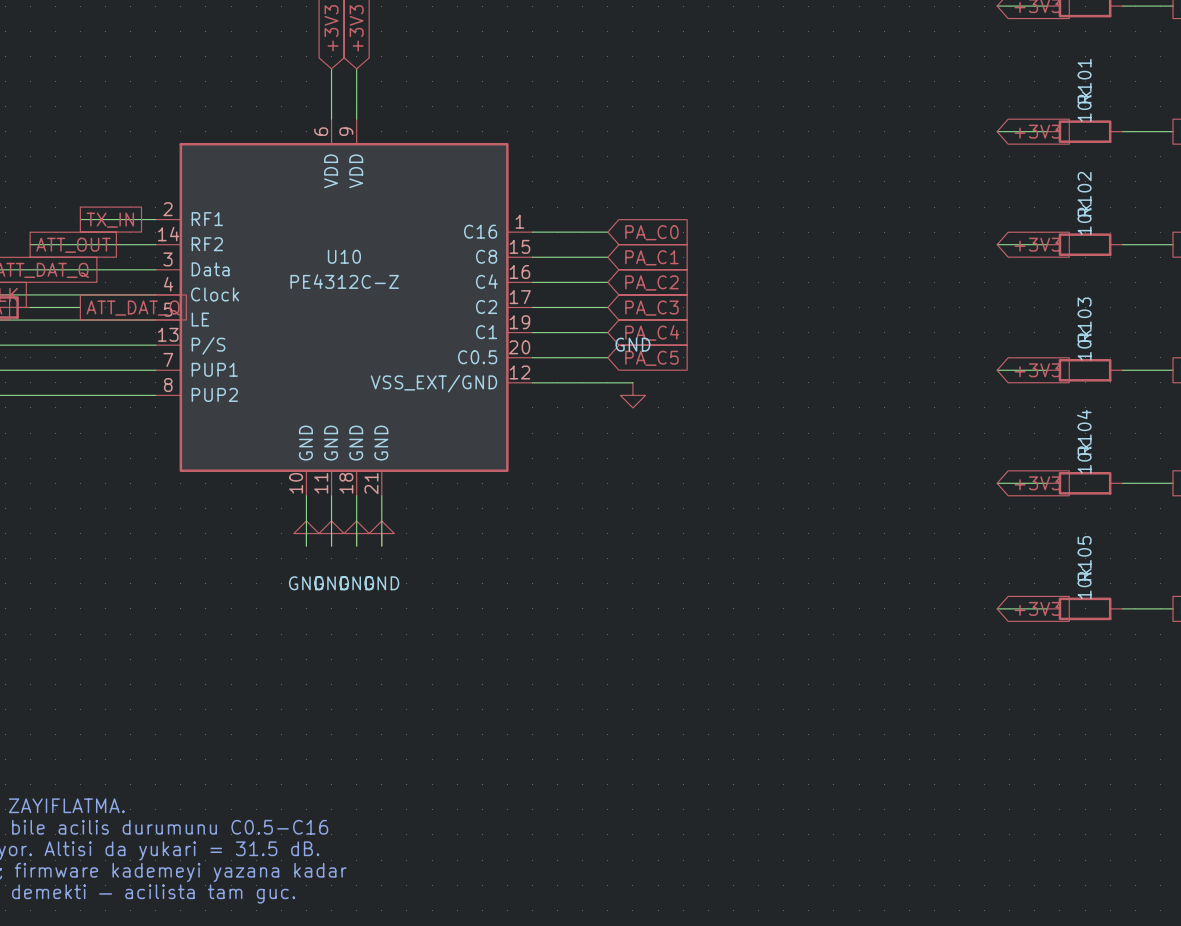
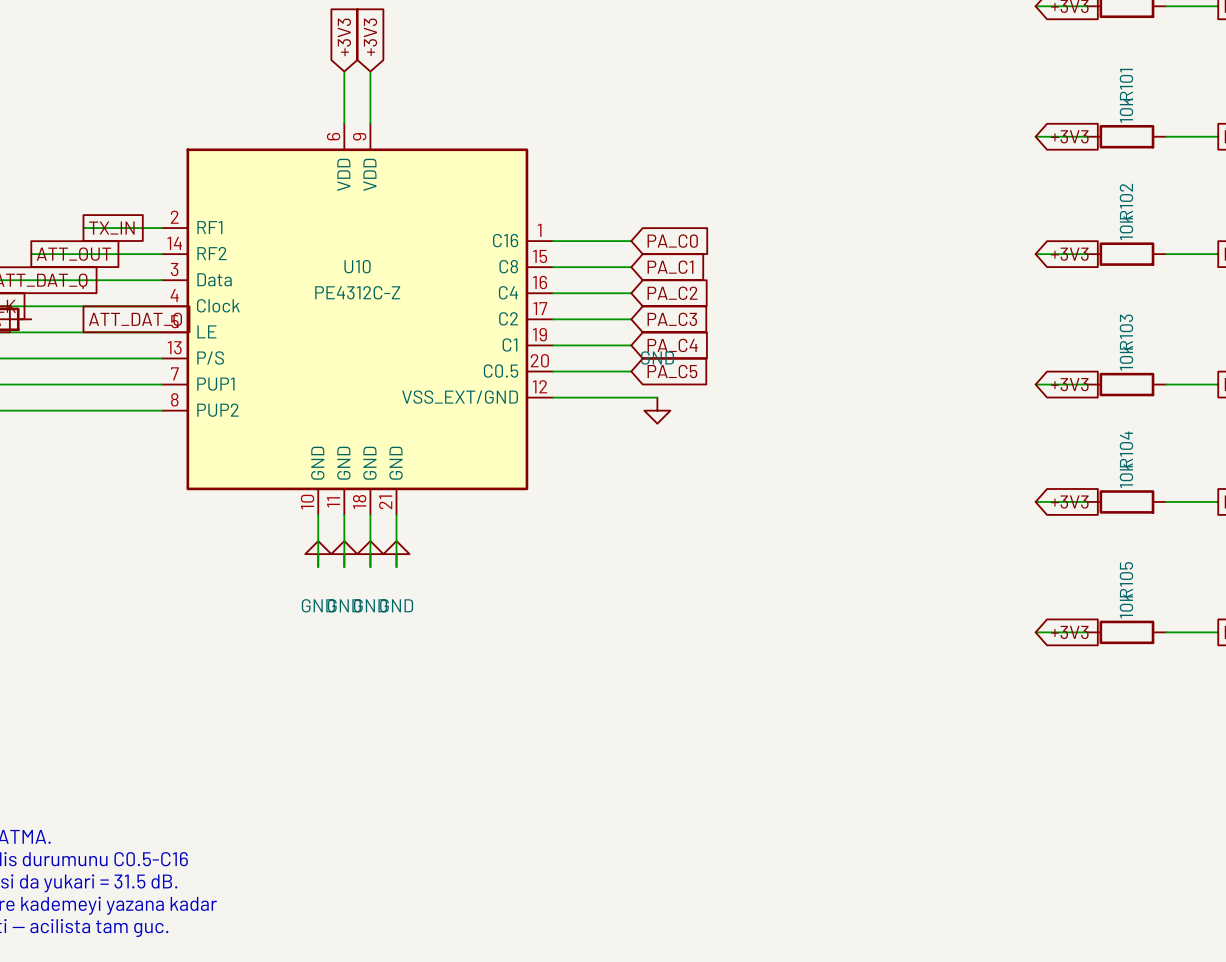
wire: (30, 307) (80, 307) -> none

